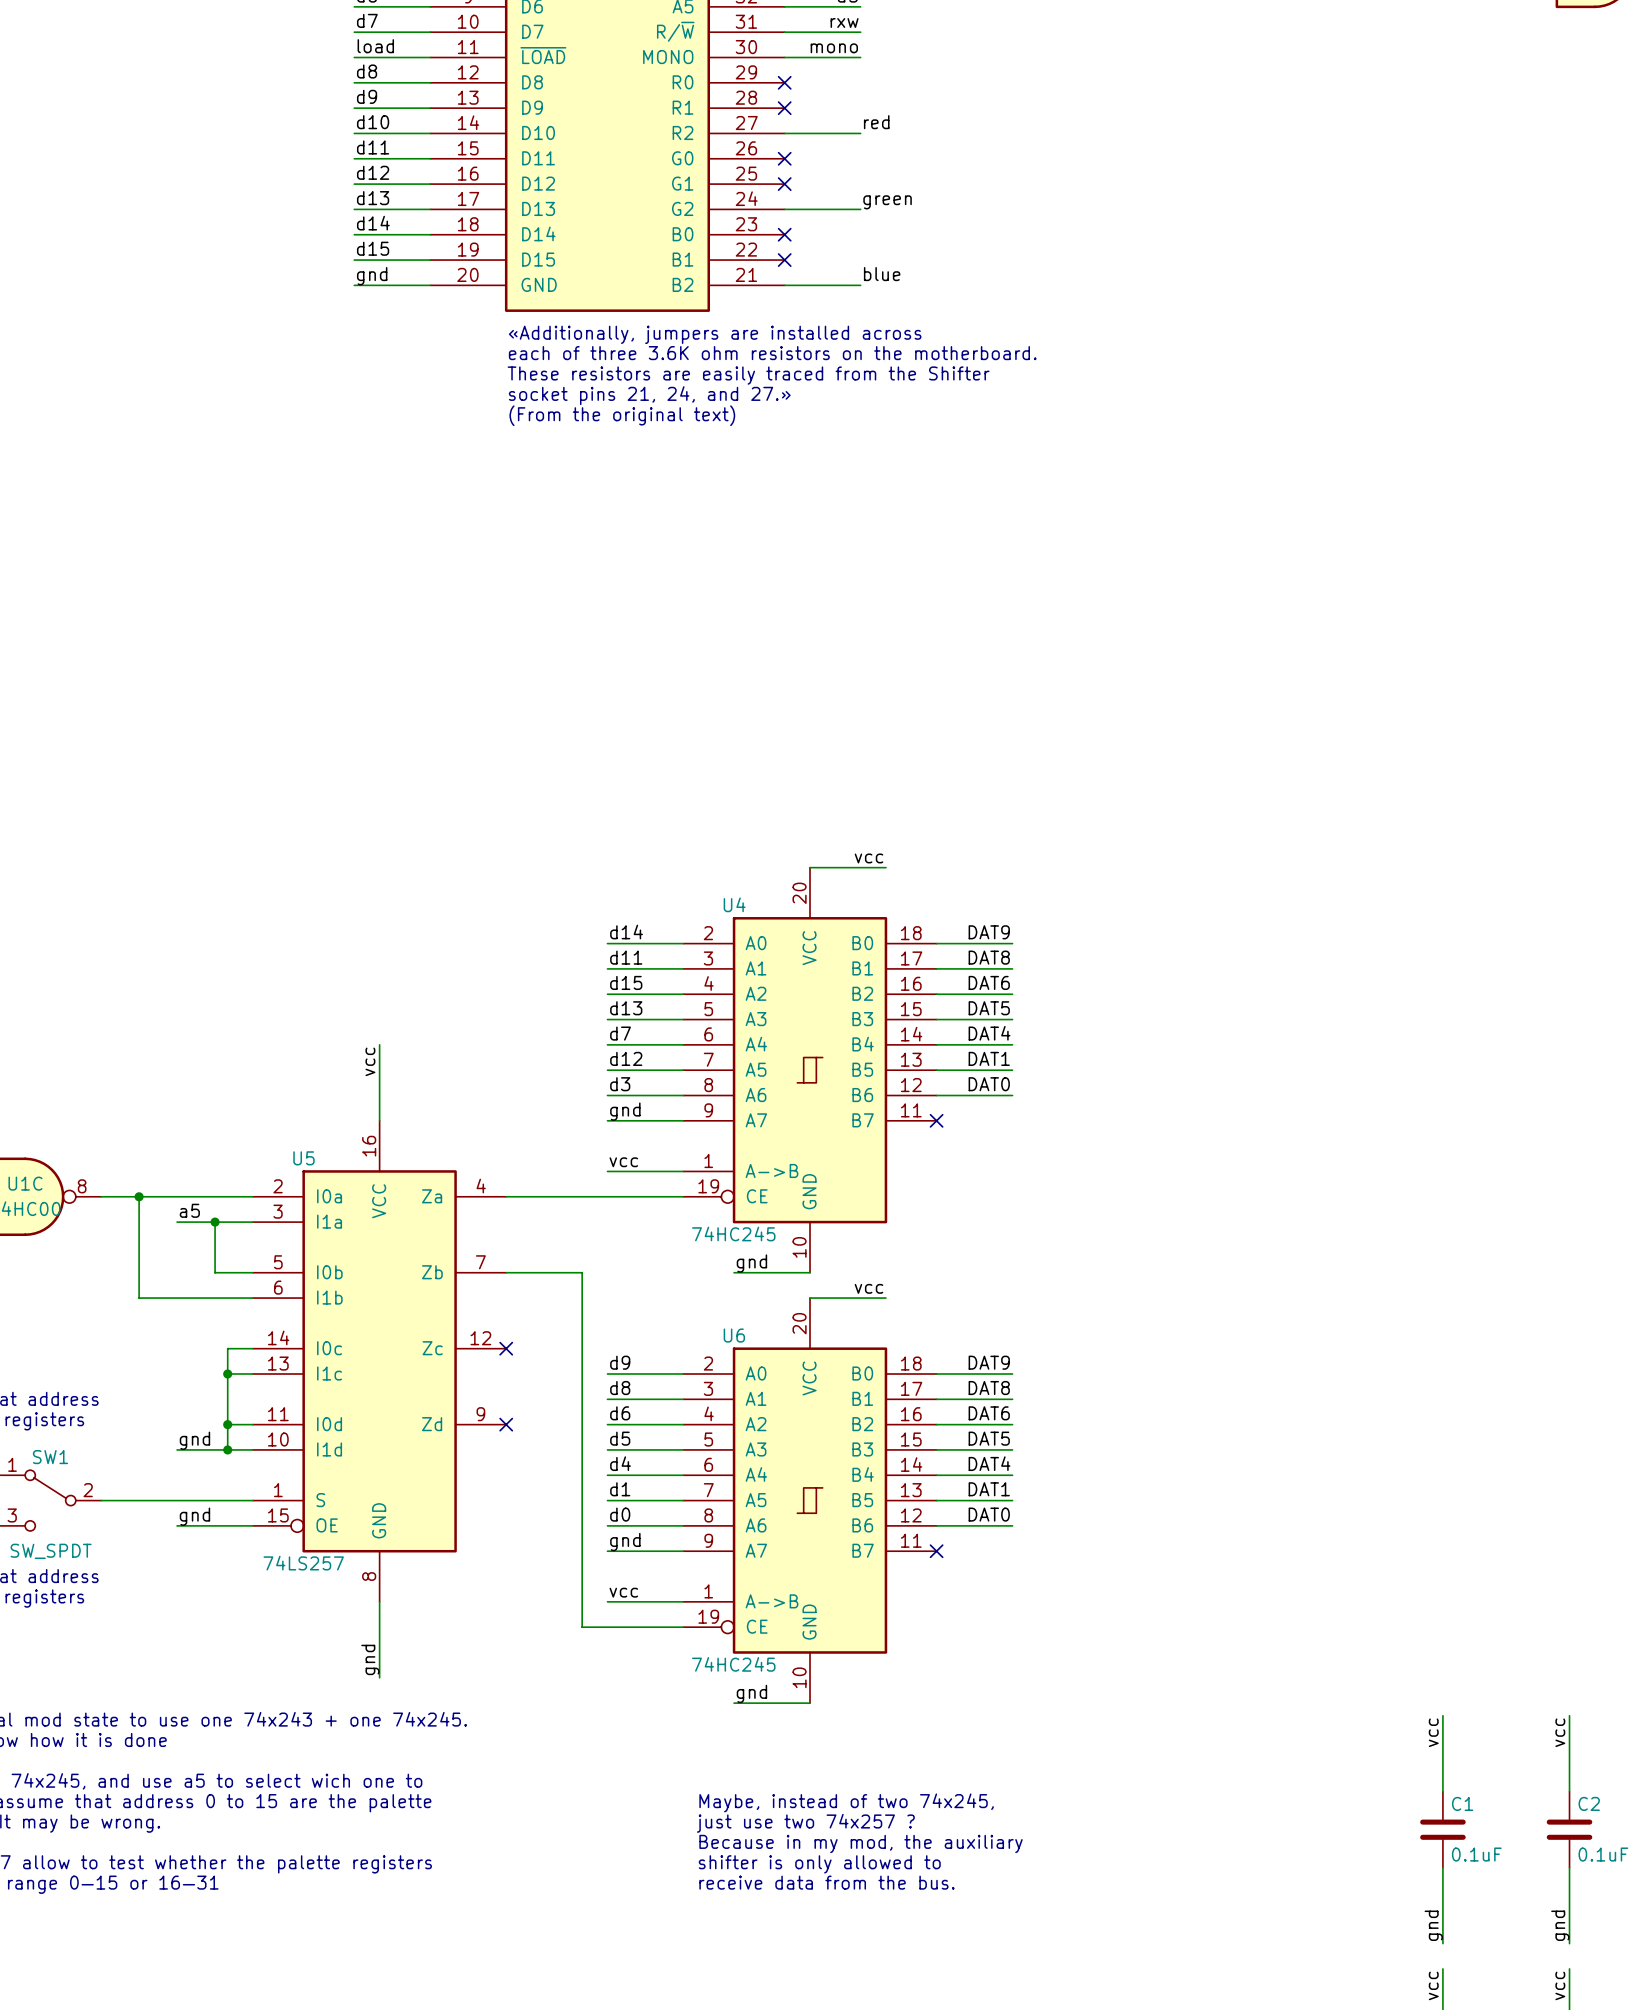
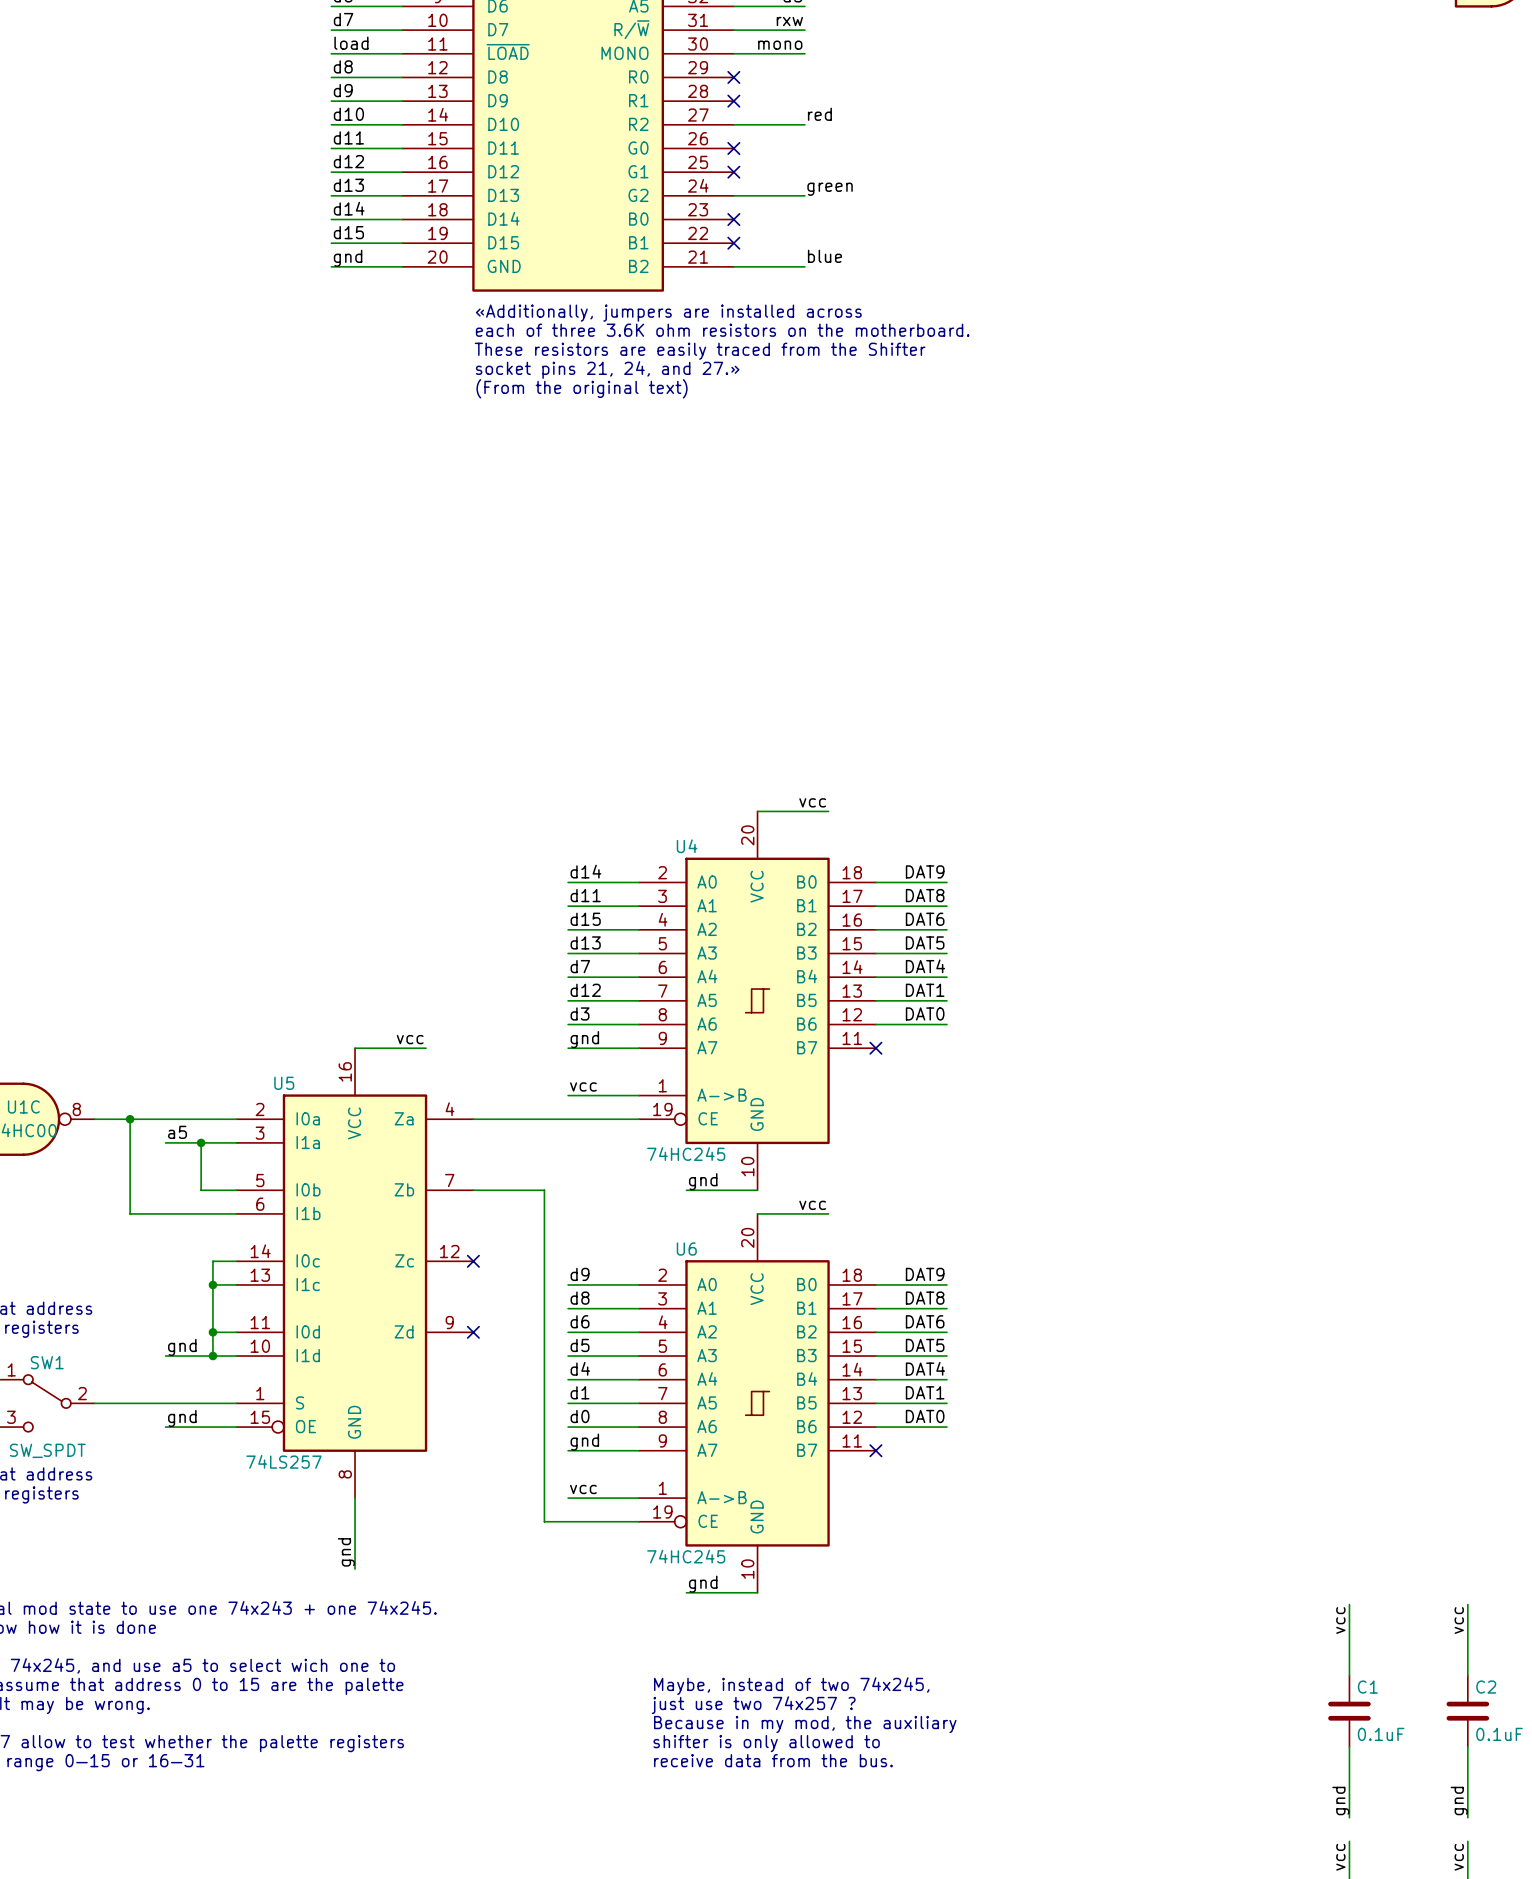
wire: (379, 1044) (379, 1120) -> (426, 1048) (355, 1048)
label rotation: 0° (370, 1061) -> 90° clockwise (410, 1039)
label position: vcc (370, 1061) -> vcc (410, 1039)

